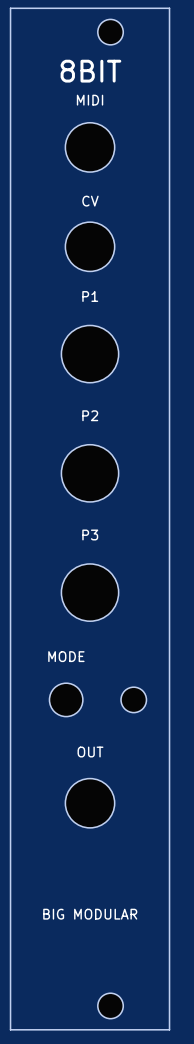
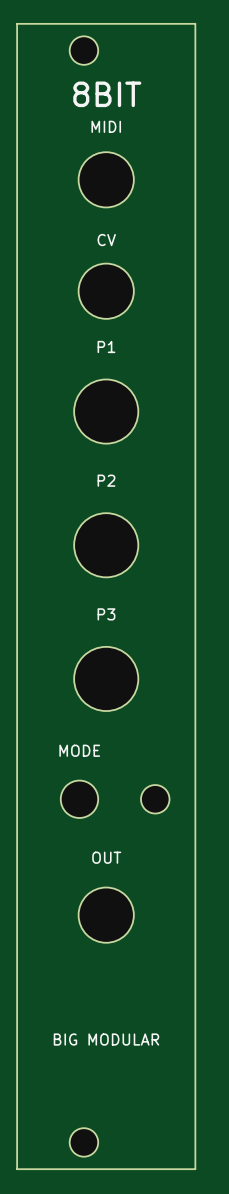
part position: (110, 32) -> (83, 50)
part position: (110, 1005) -> (83, 1142)

